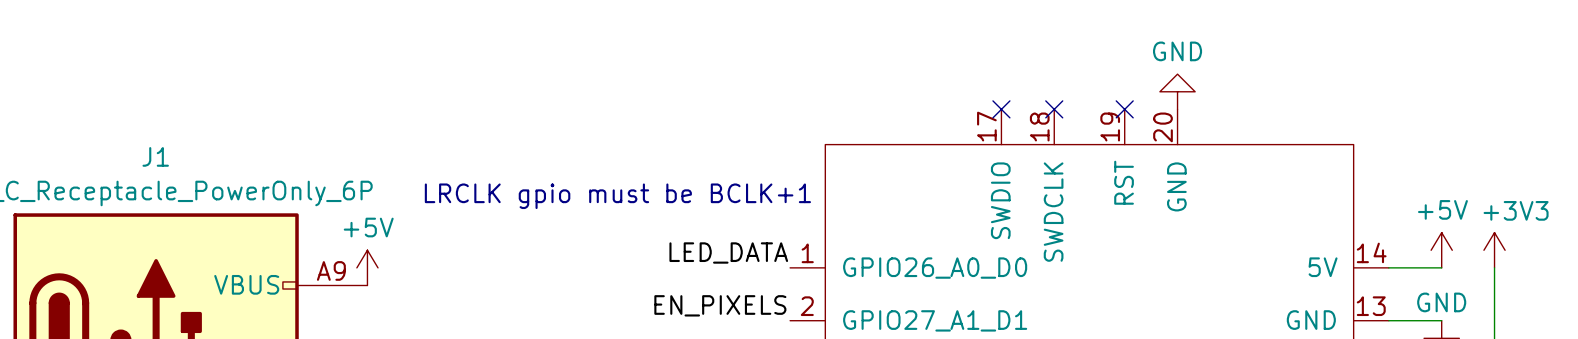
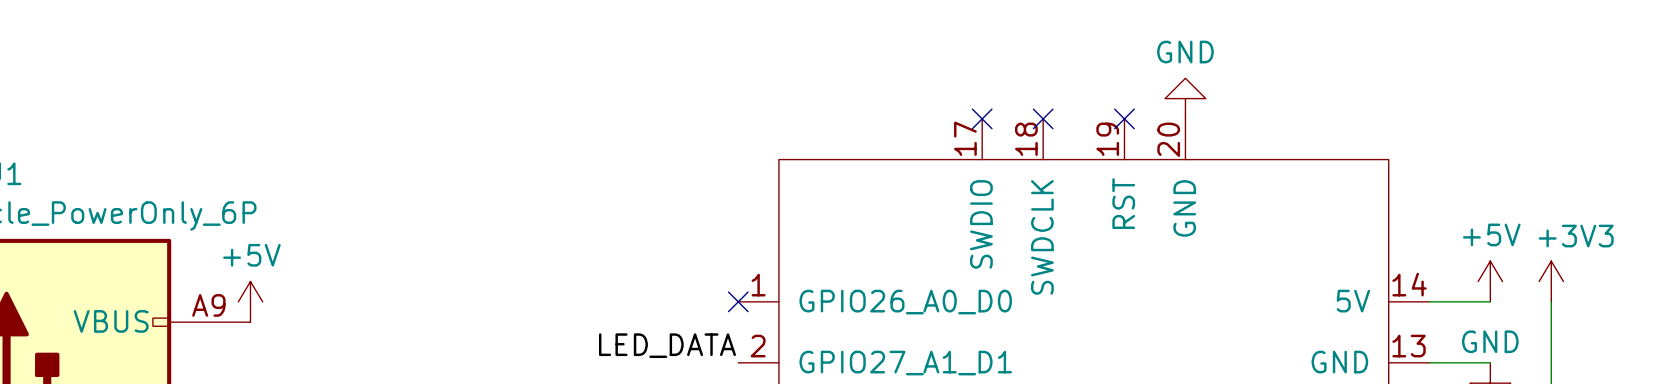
text: LRCLK gpio must be BCLK+1 (617, 196) -> none
label: LED_DATA (728, 253) -> none
no-connect mark: none -> (738, 301)
label: EN_PIXELS (720, 305) -> LED_DATA (667, 345)

